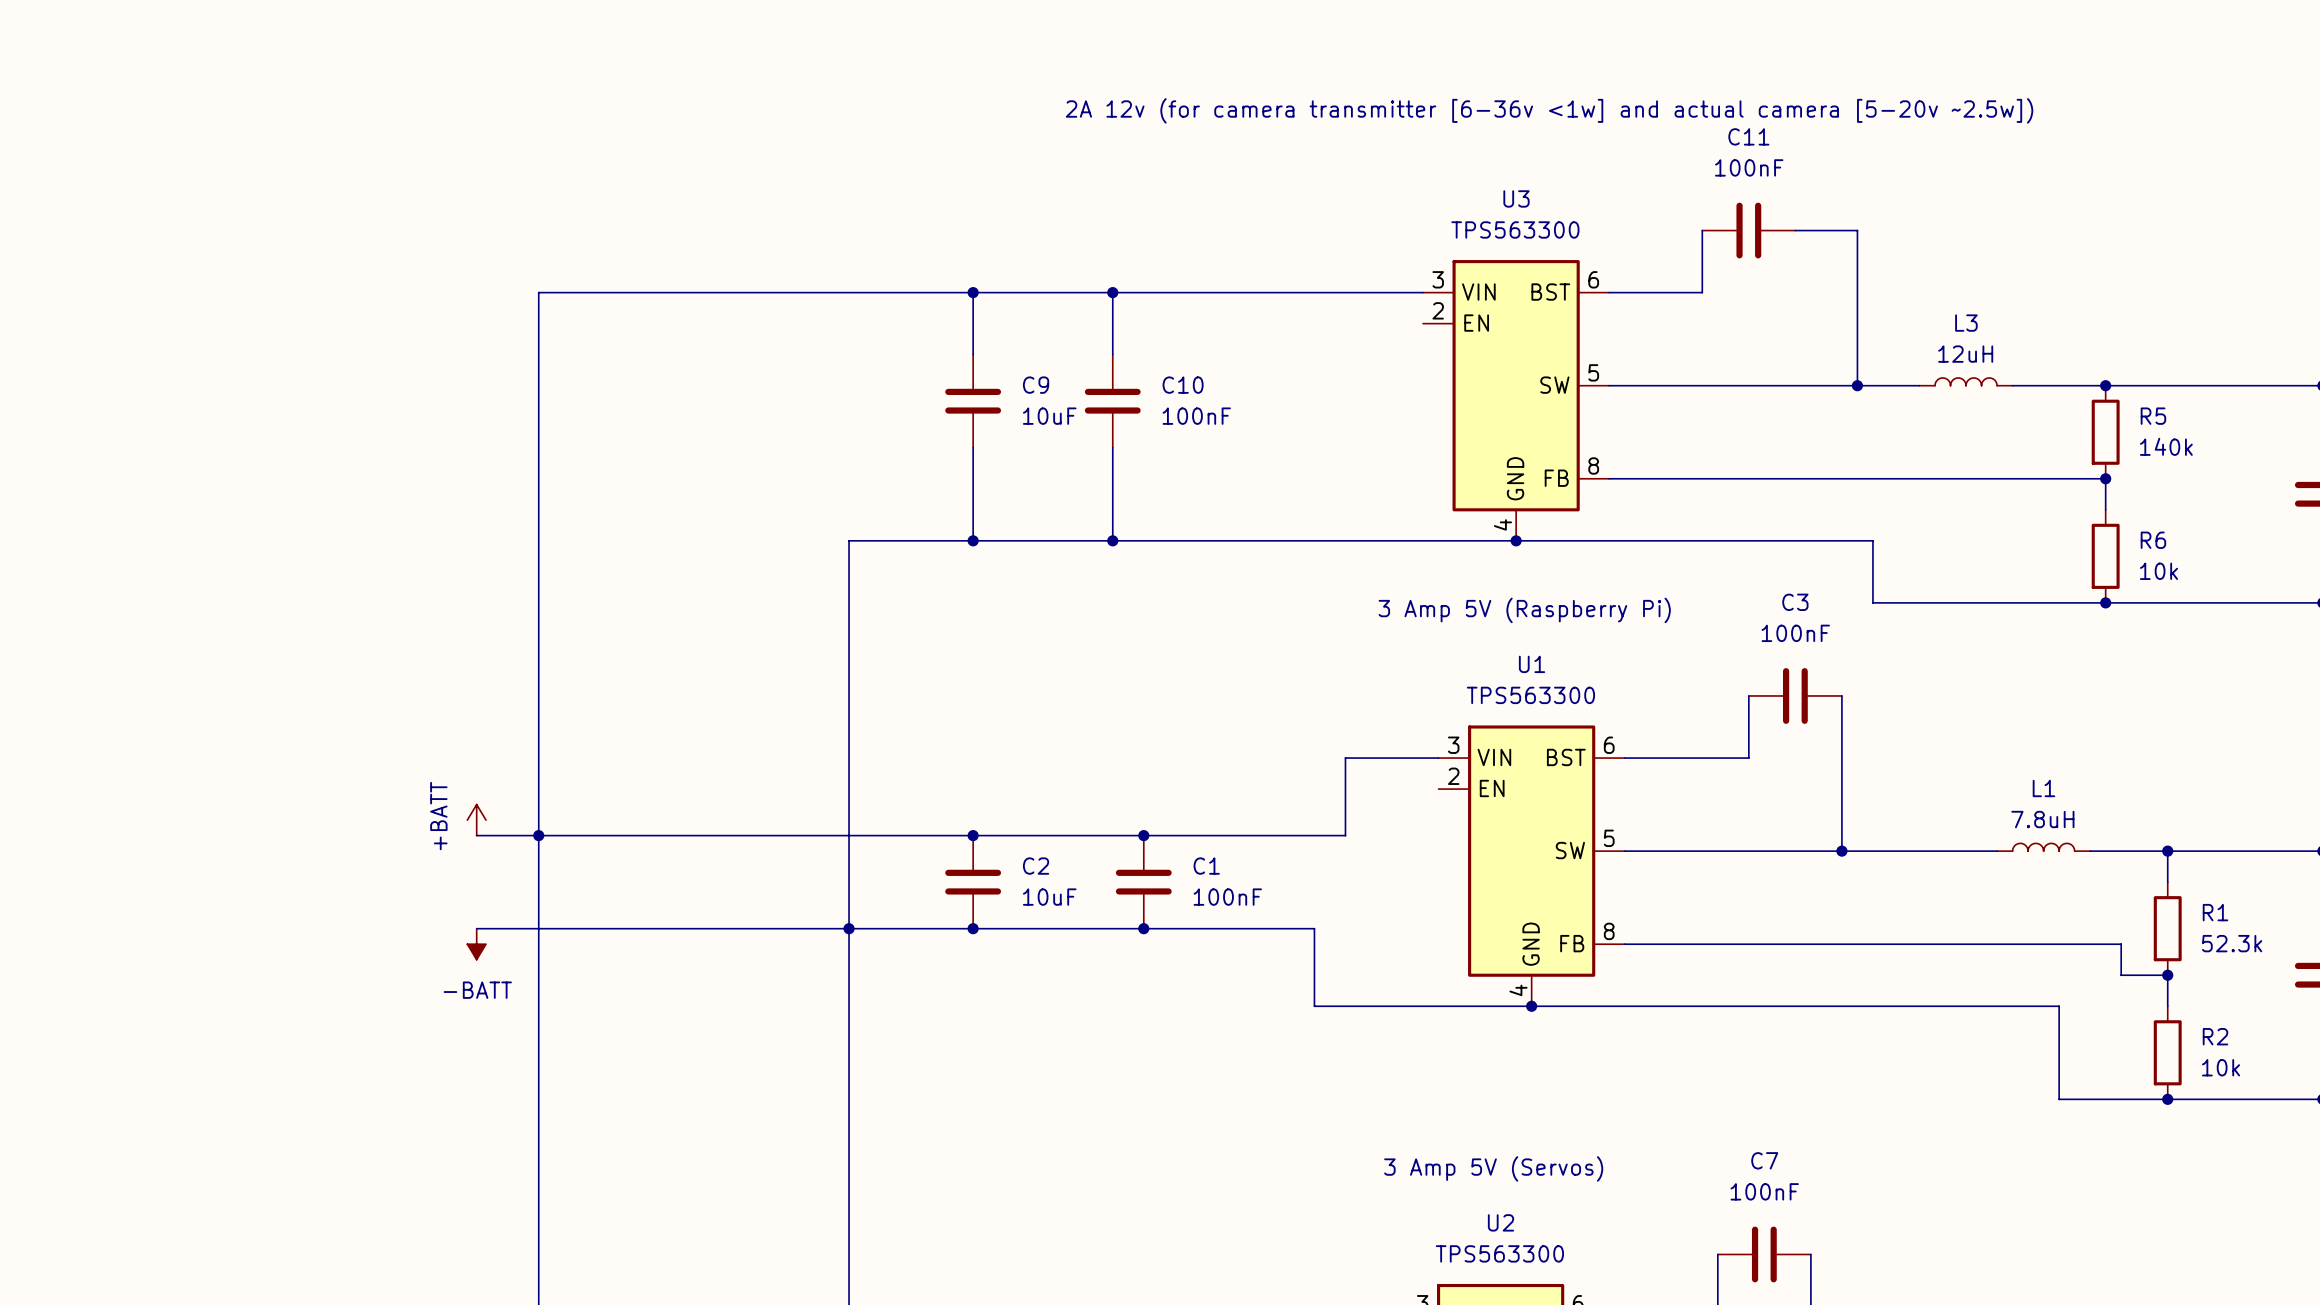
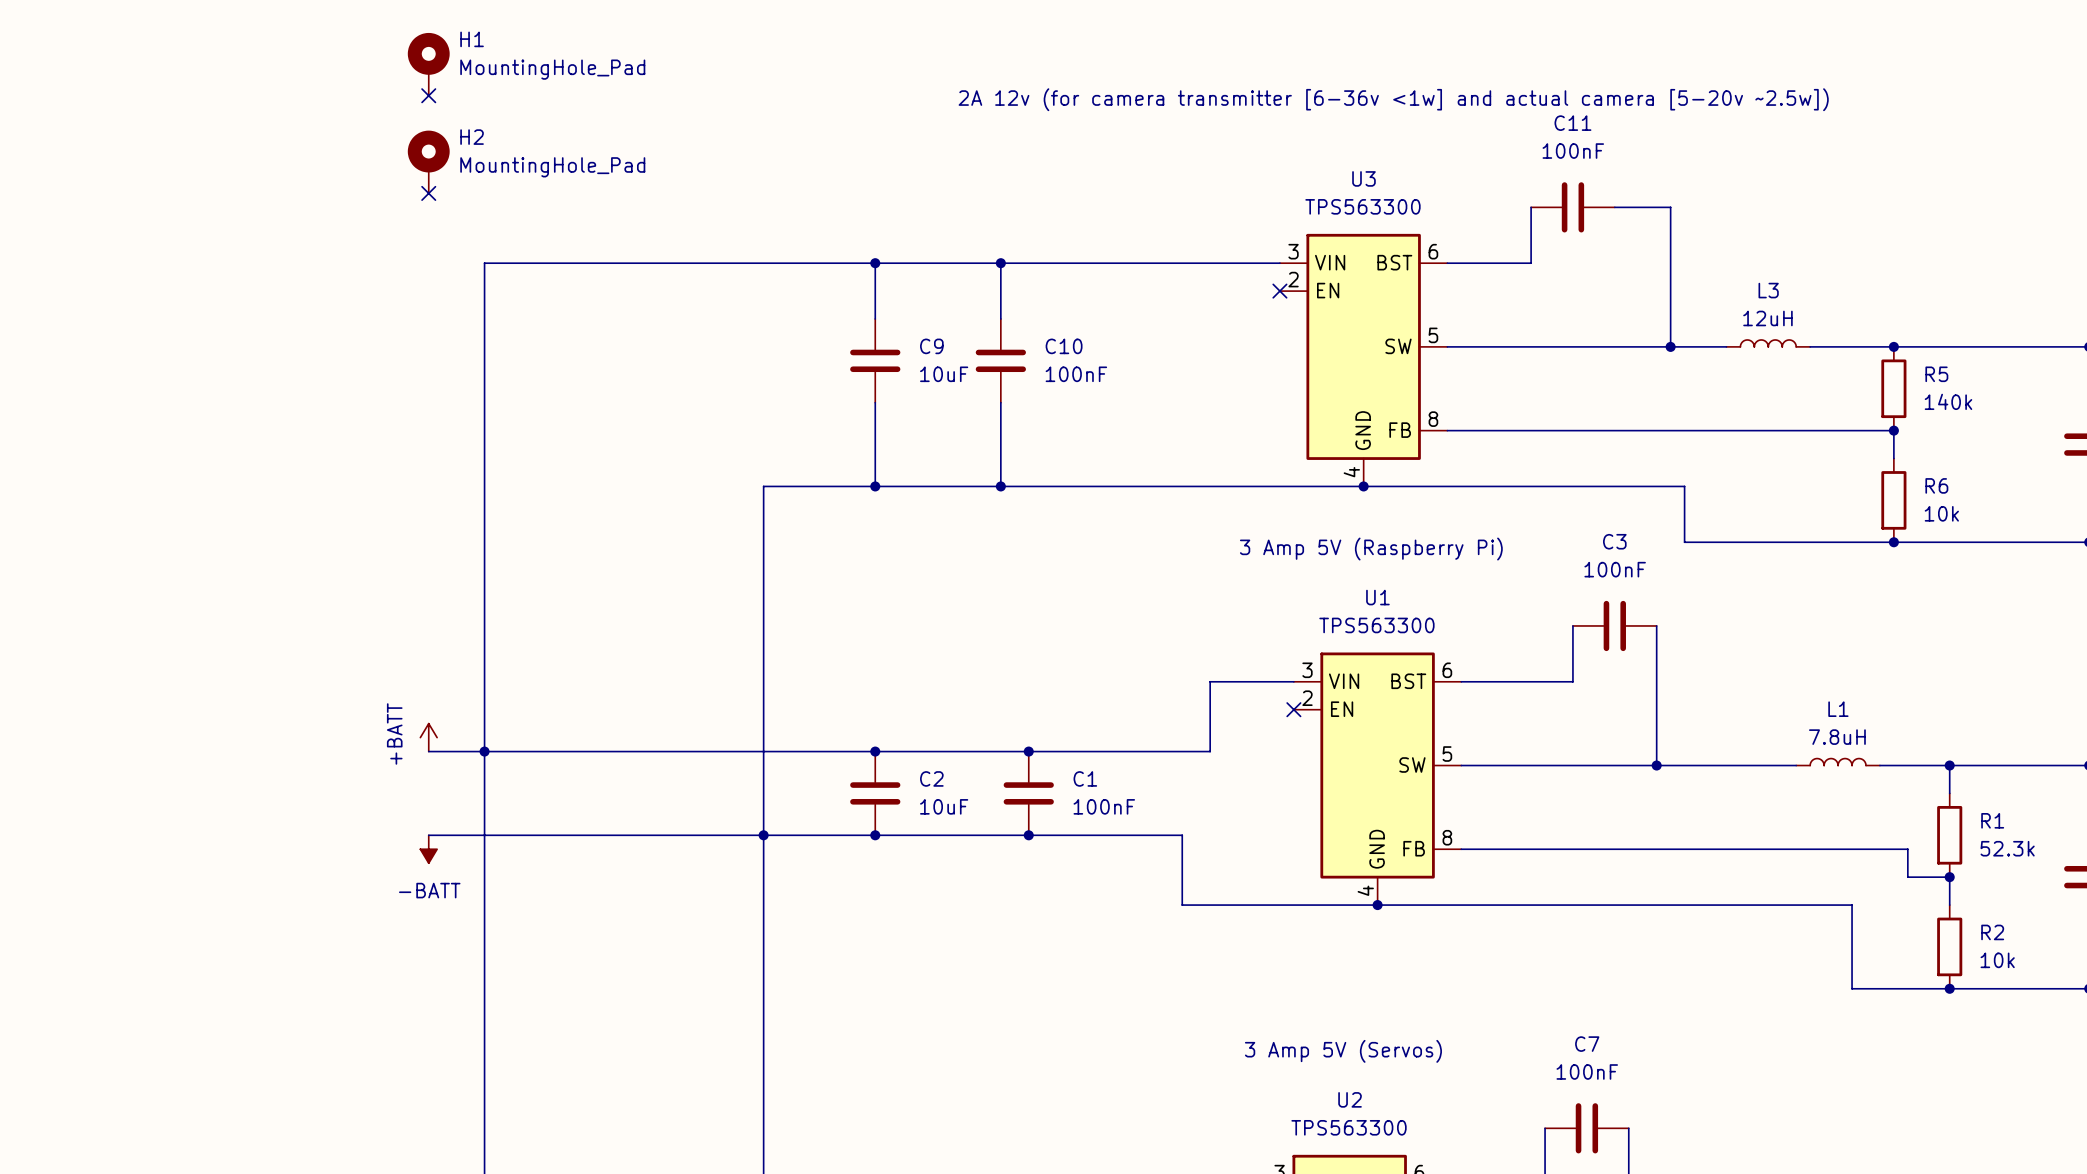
H1: none -> MountingHole_Pad (428, 64)
no-connect mark: none -> (428, 95)
H2: none -> MountingHole_Pad (428, 162)
no-connect mark: none -> (428, 193)
no-connect mark: none -> (1279, 291)
no-connect mark: none -> (1293, 709)

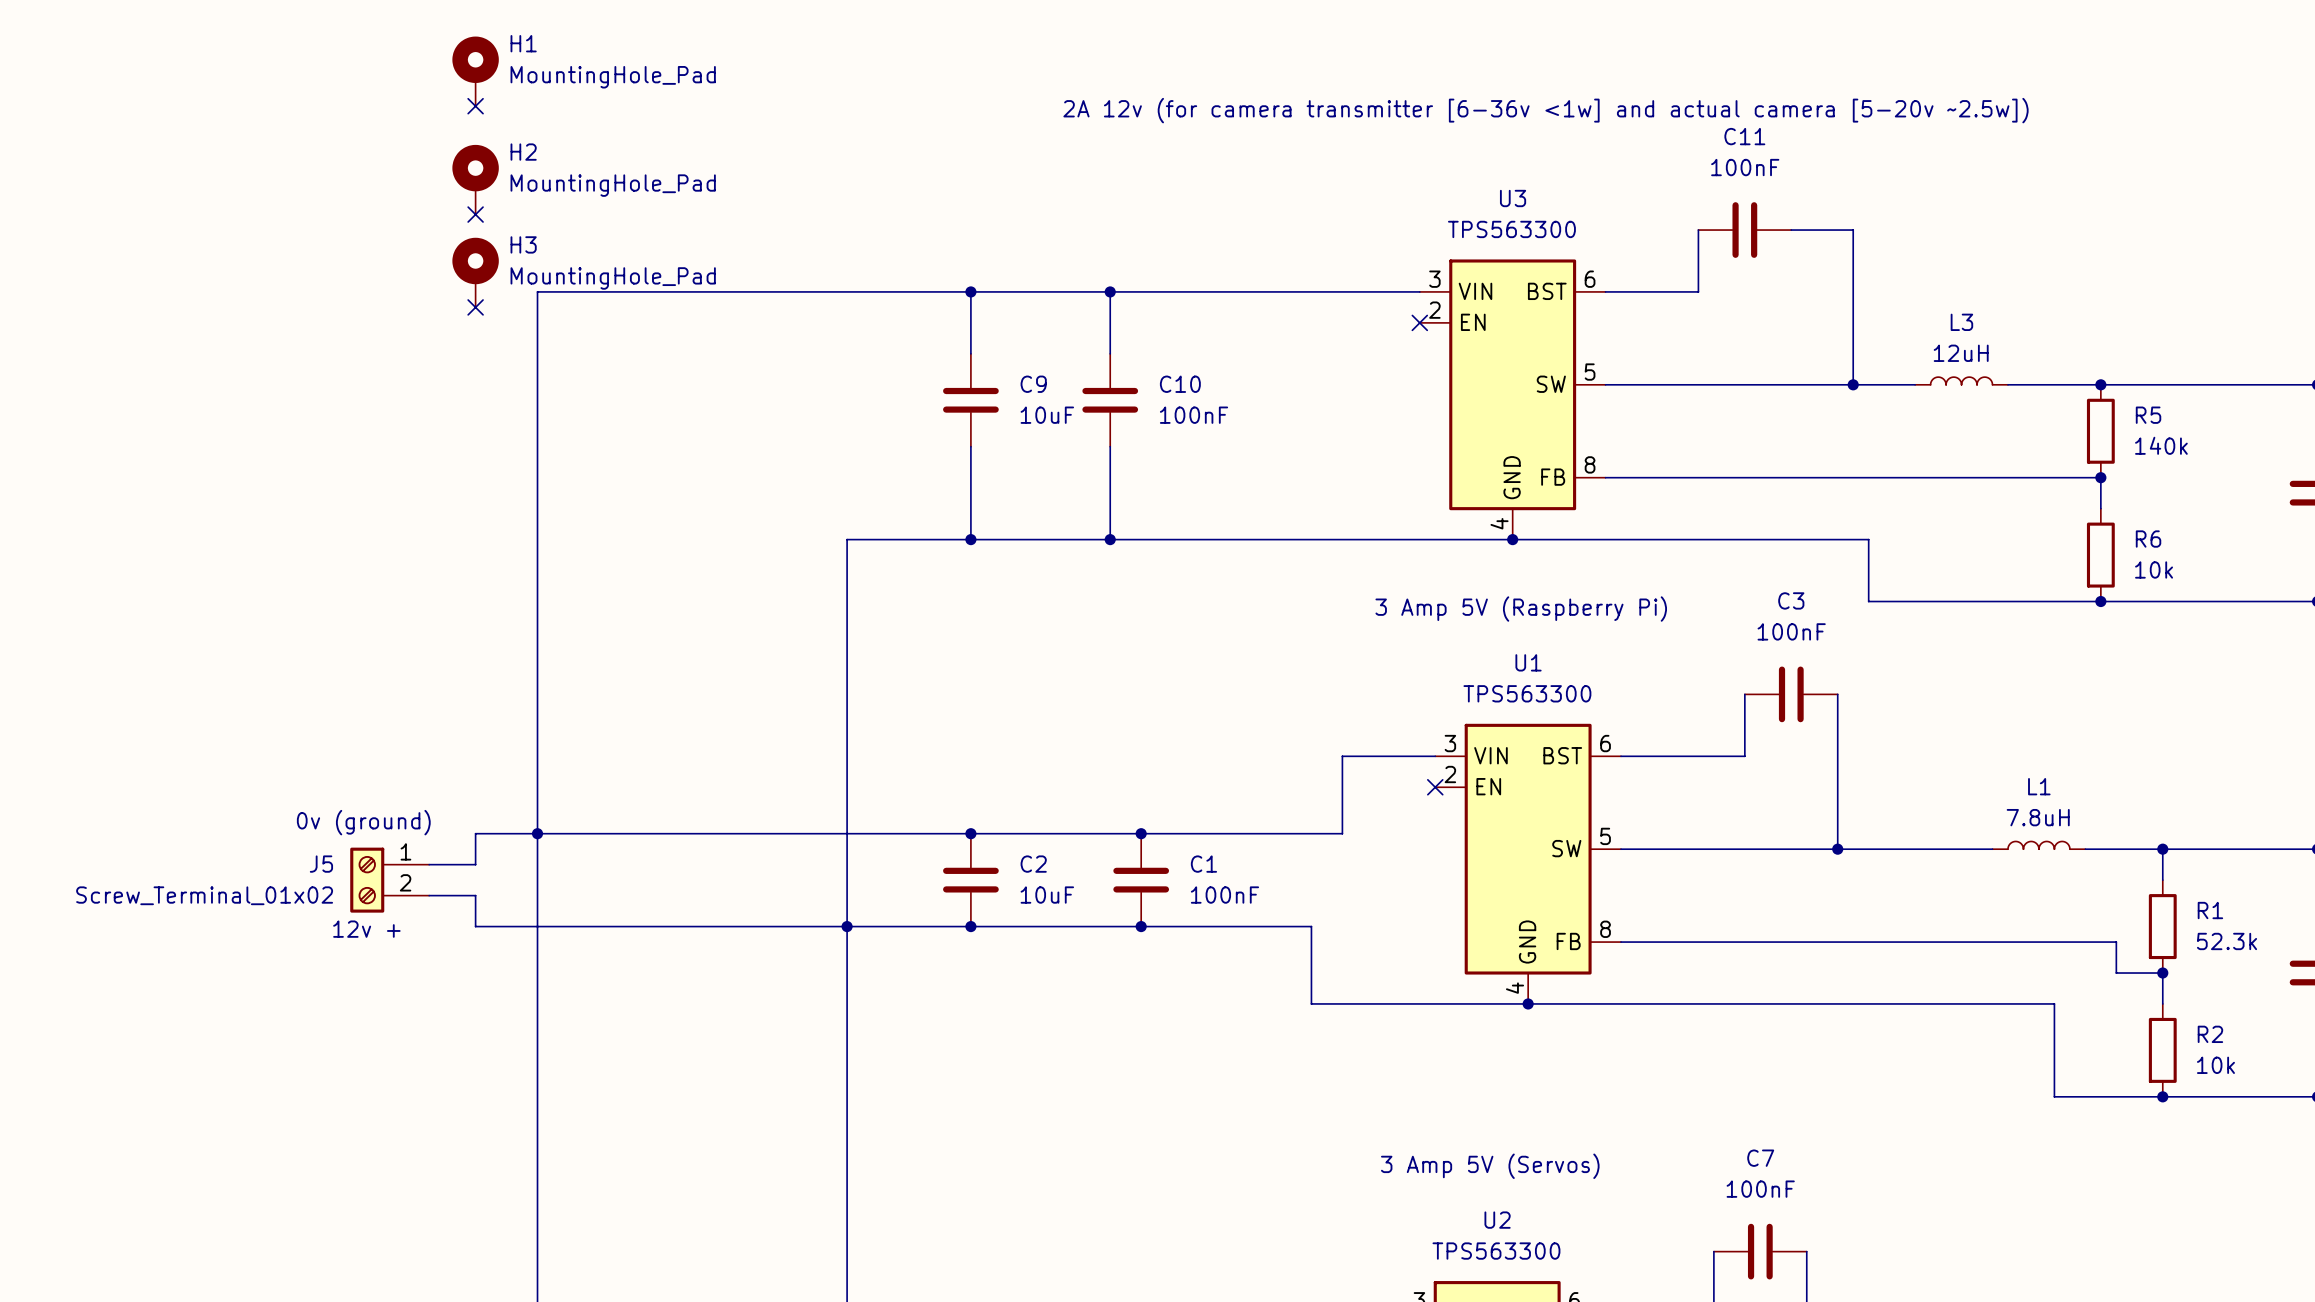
H3: none -> MountingHole_Pad (475, 272)
no-connect mark: none -> (475, 307)
power symbol: +BATT (428, 737) -> none
text: none -> 0v (ground) (363, 822)
wire: none -> (475, 833) (475, 864) (429, 864)
J5: none -> Screw_Terminal_01x02 (389, 880)
wire: none -> (429, 895) (475, 895) (475, 926)
text: none -> 12v + (366, 929)
power symbol: -BATT (428, 849) -> none

